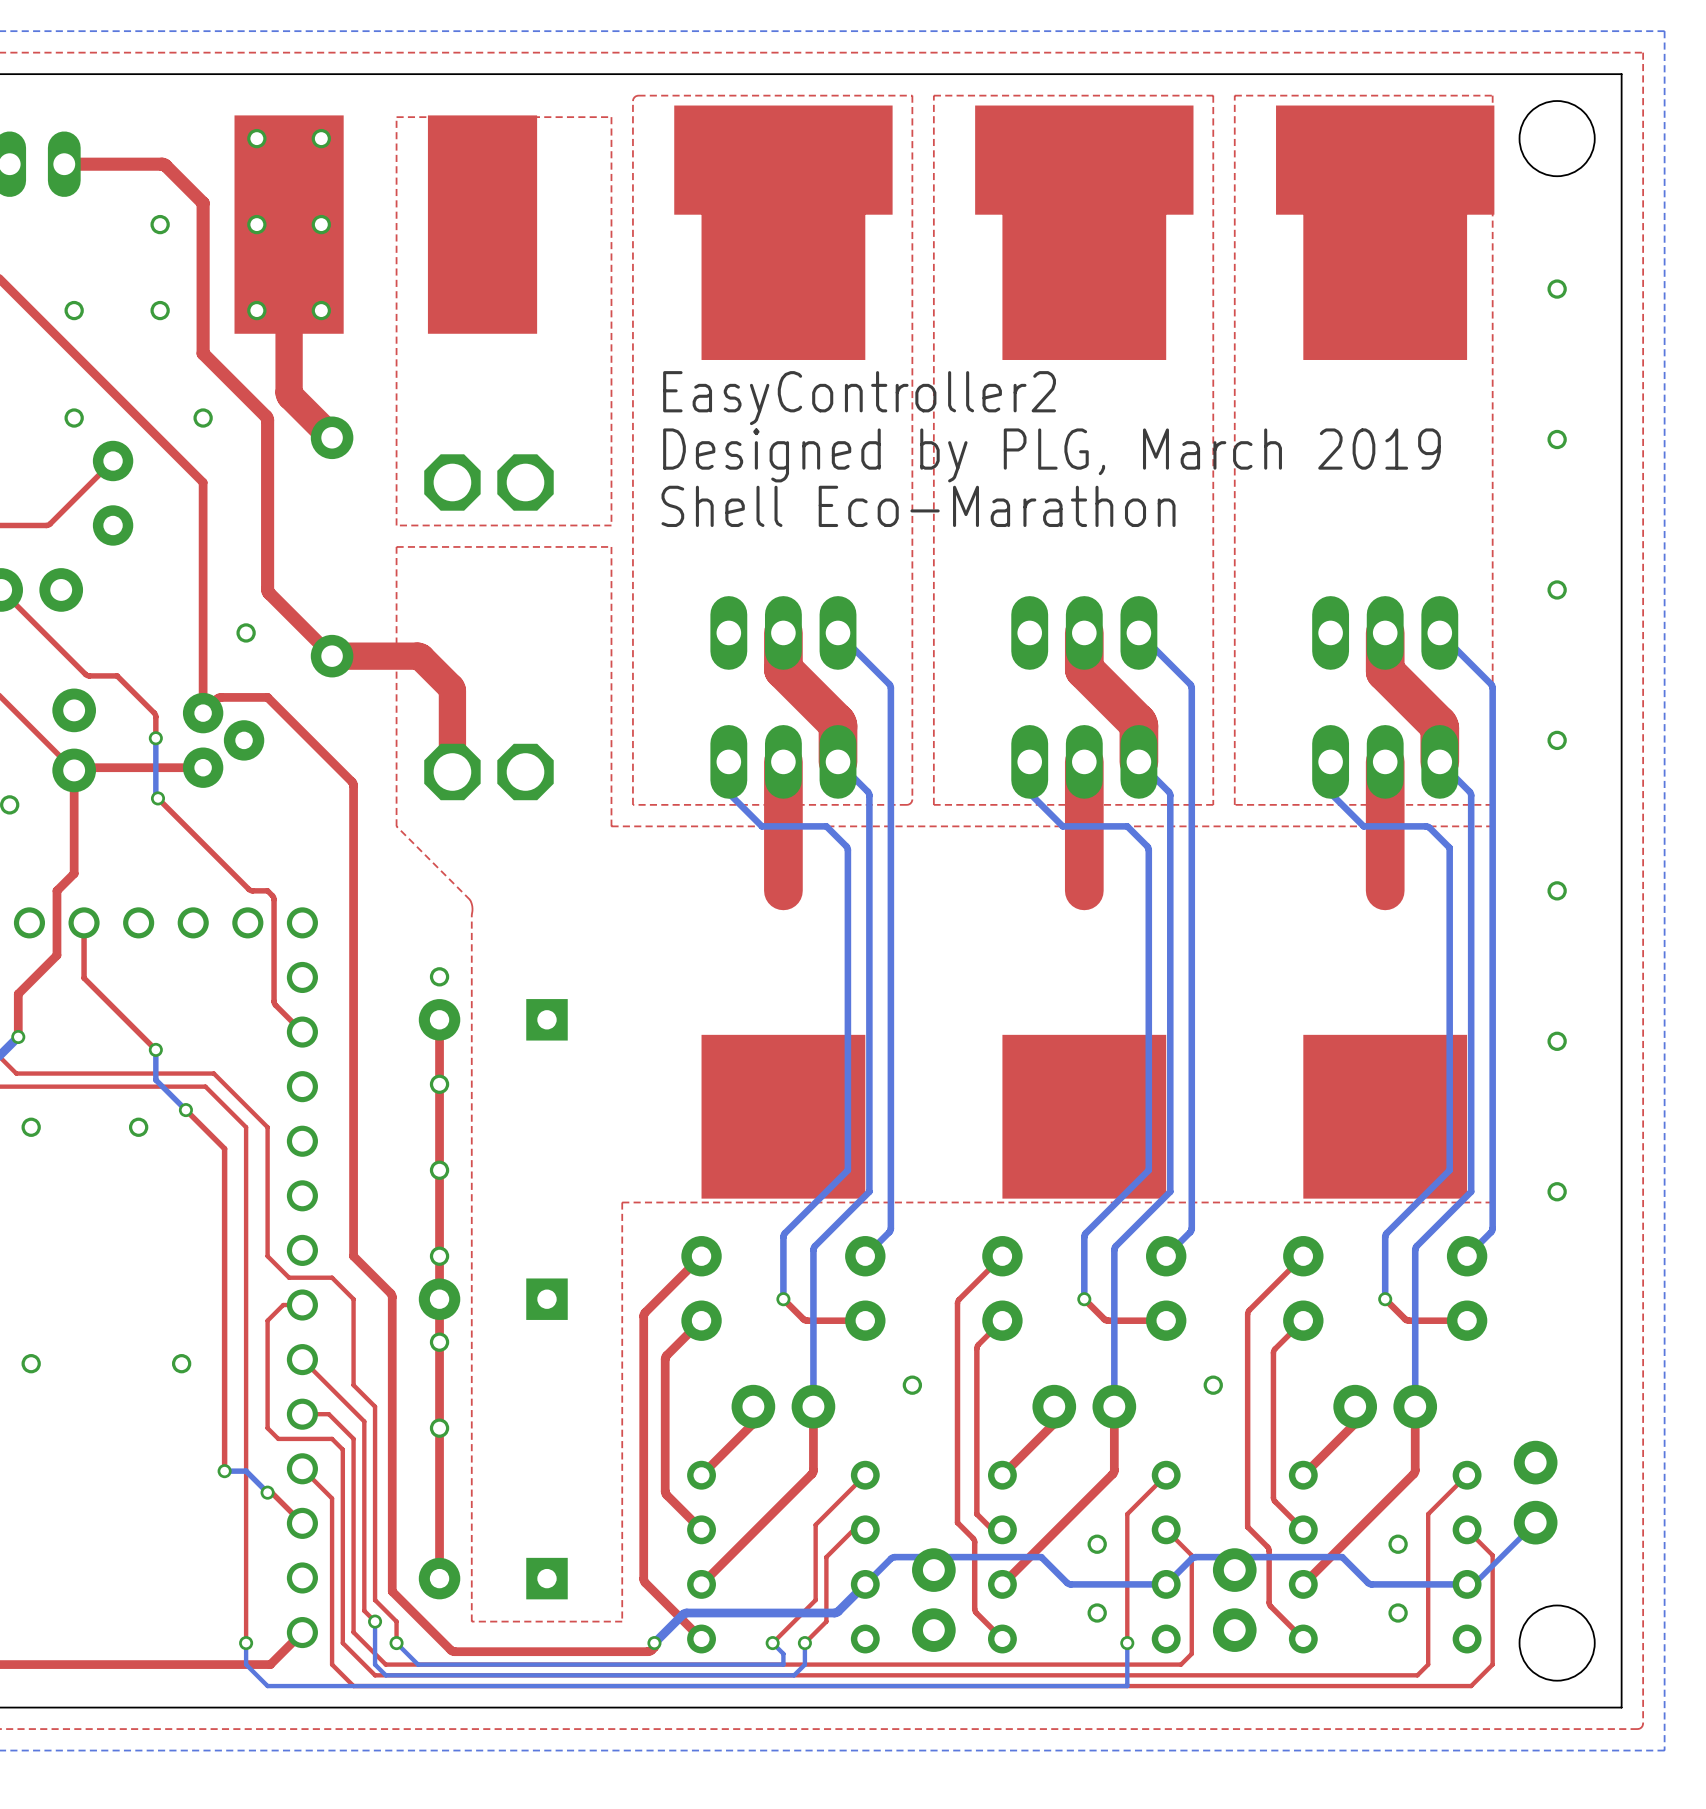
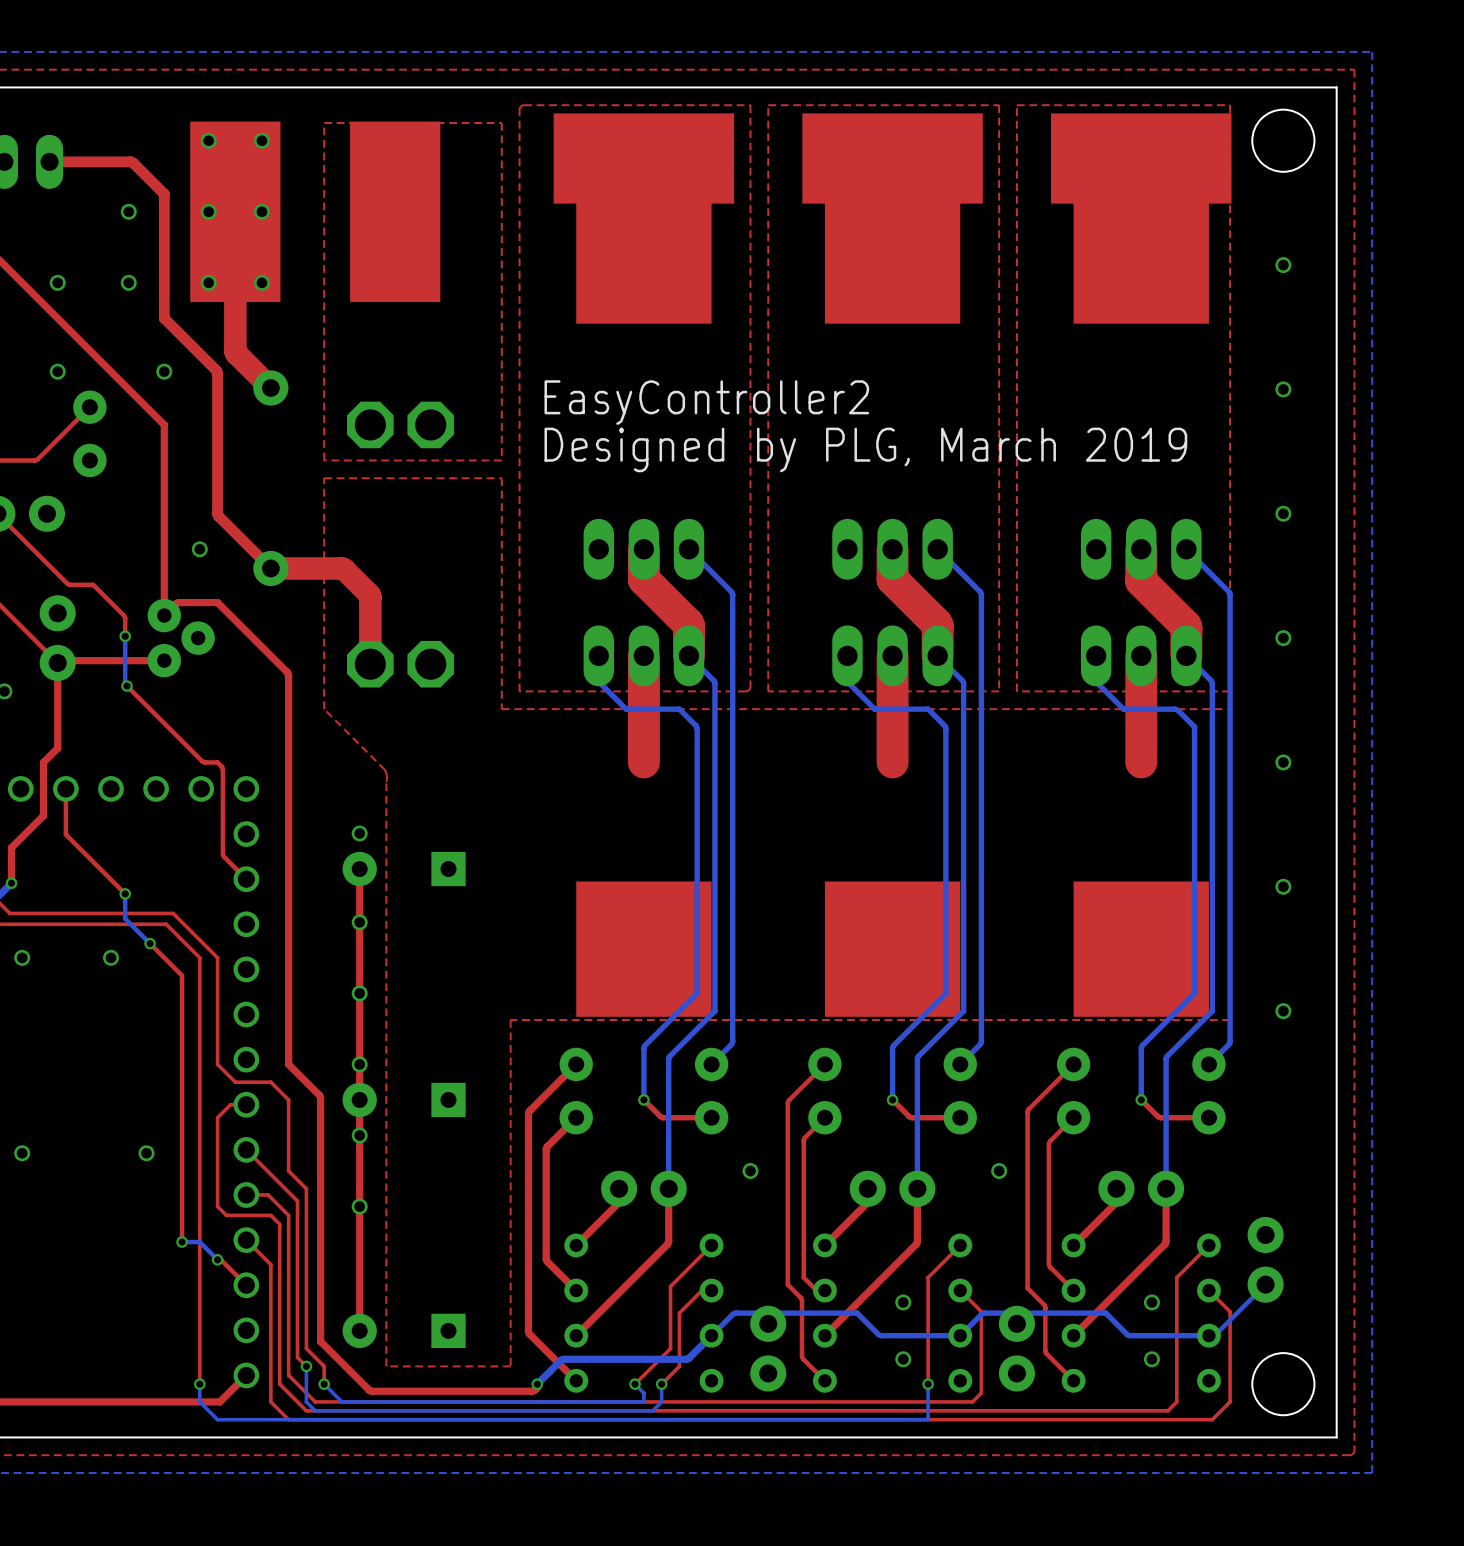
text: EasyController2 (859, 398) -> none
text: Designed by PLG, March 2019 (1051, 455) -> EasyController2 (706, 402)
text: Shell Eco-Marathon (918, 506) -> Designed by PLG, March 2019 (865, 449)

